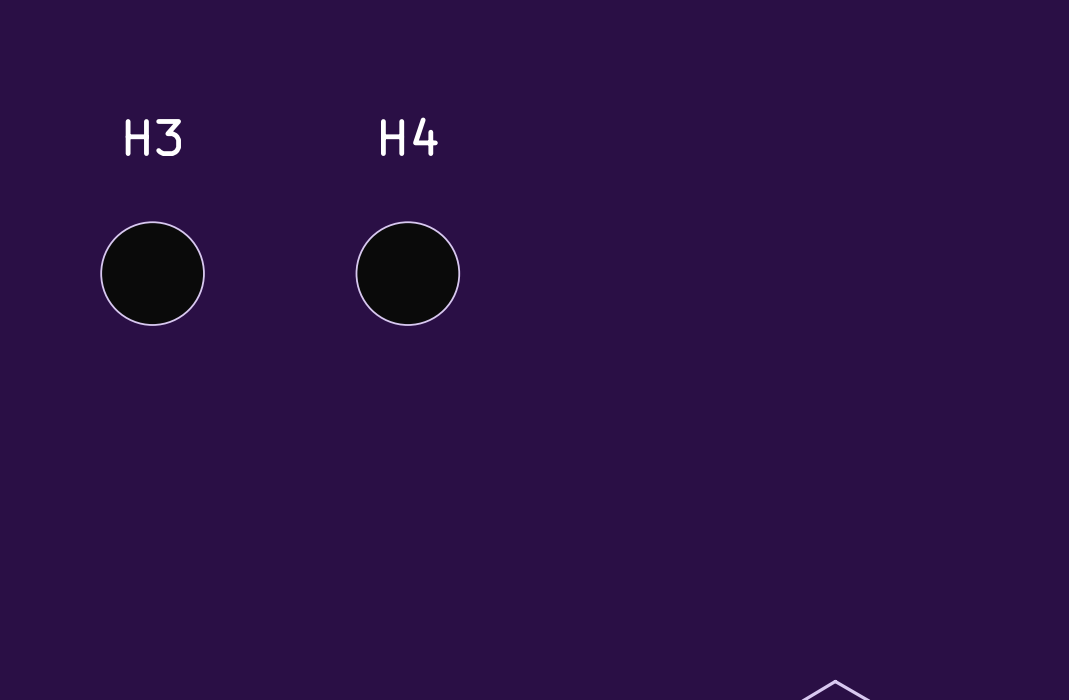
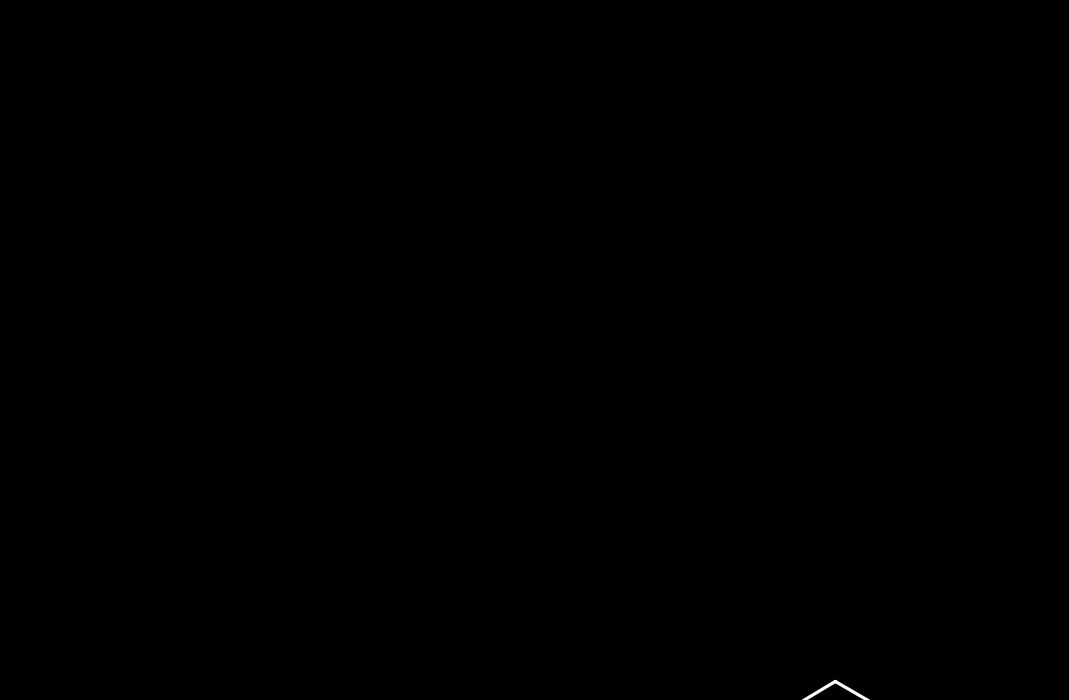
H3: (152, 273) -> none
H4: (407, 273) -> none

